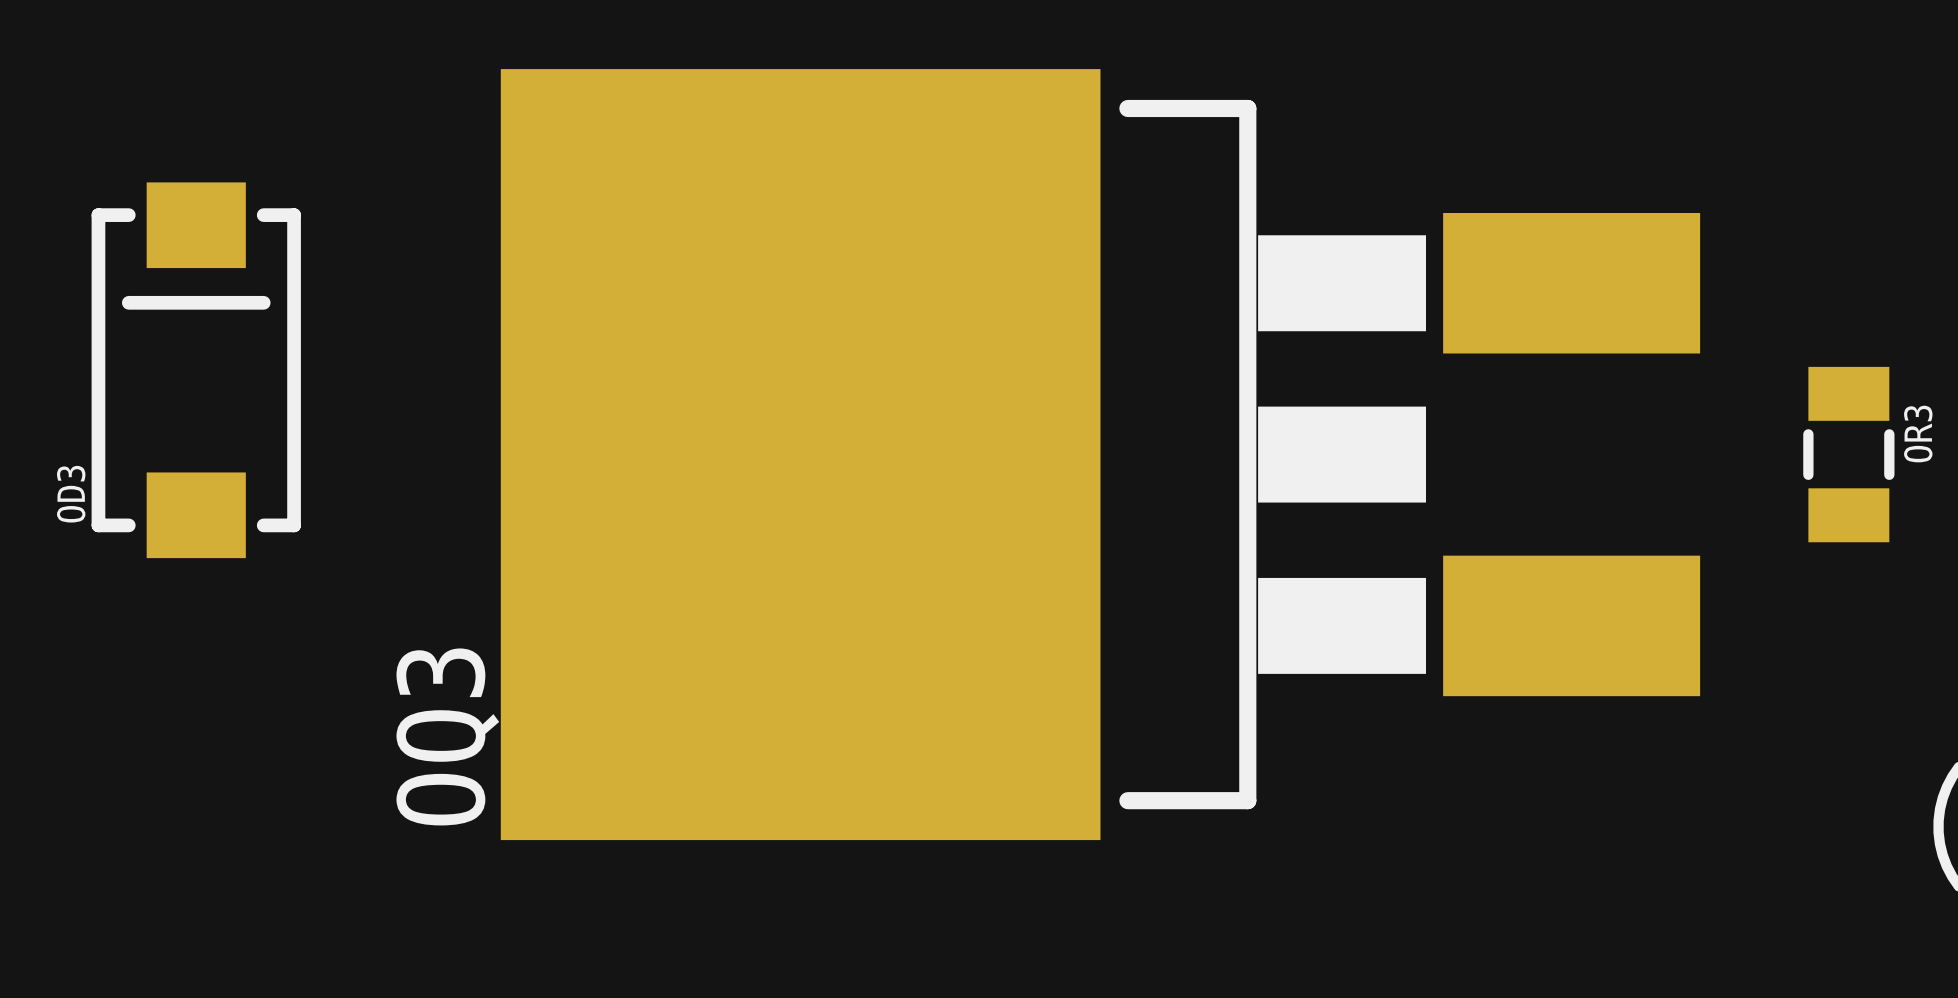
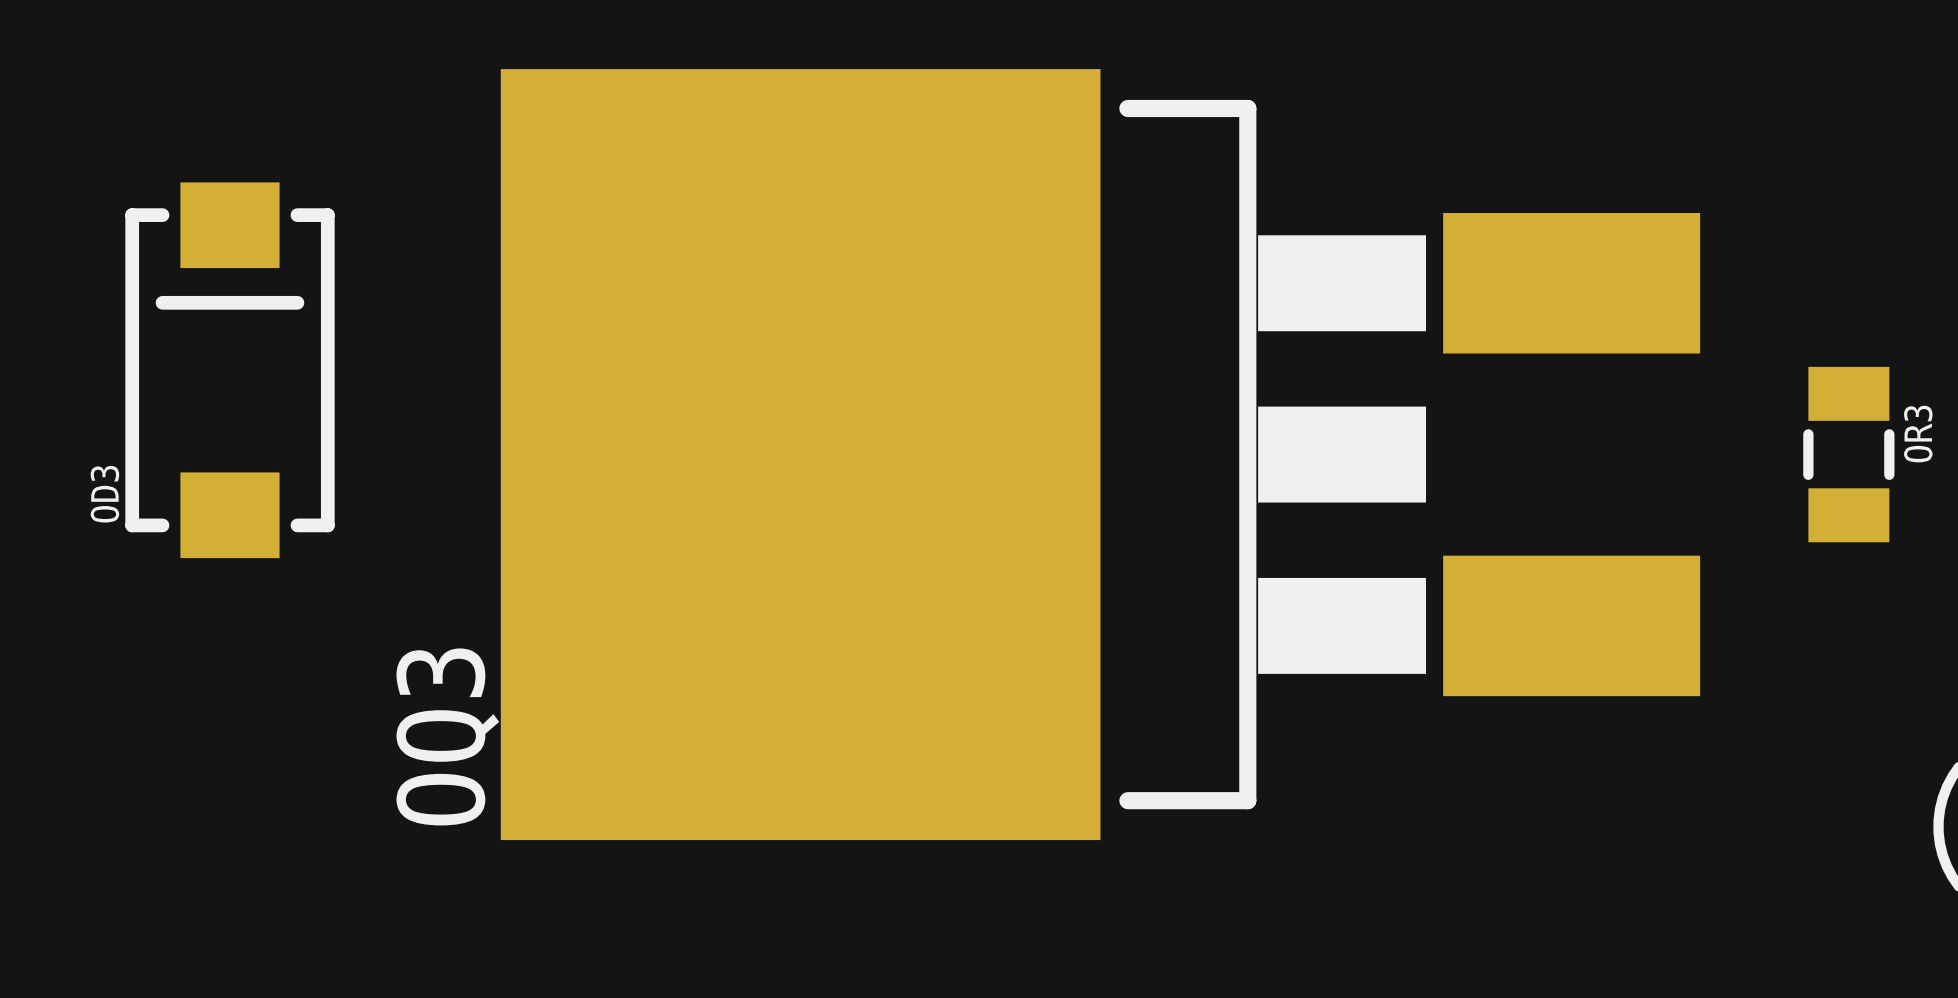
OD3 position: (196, 370) -> (229, 370)

